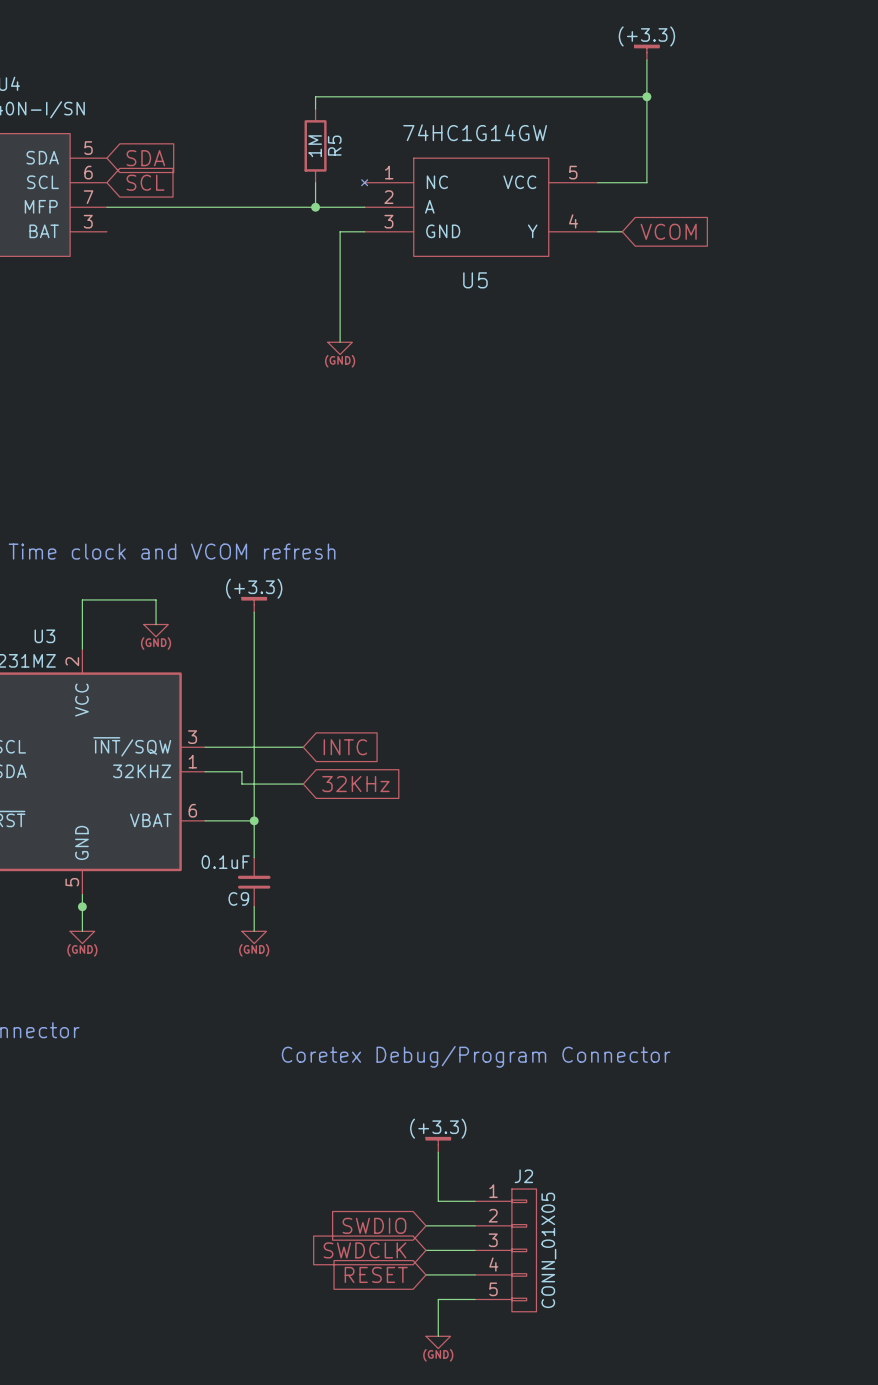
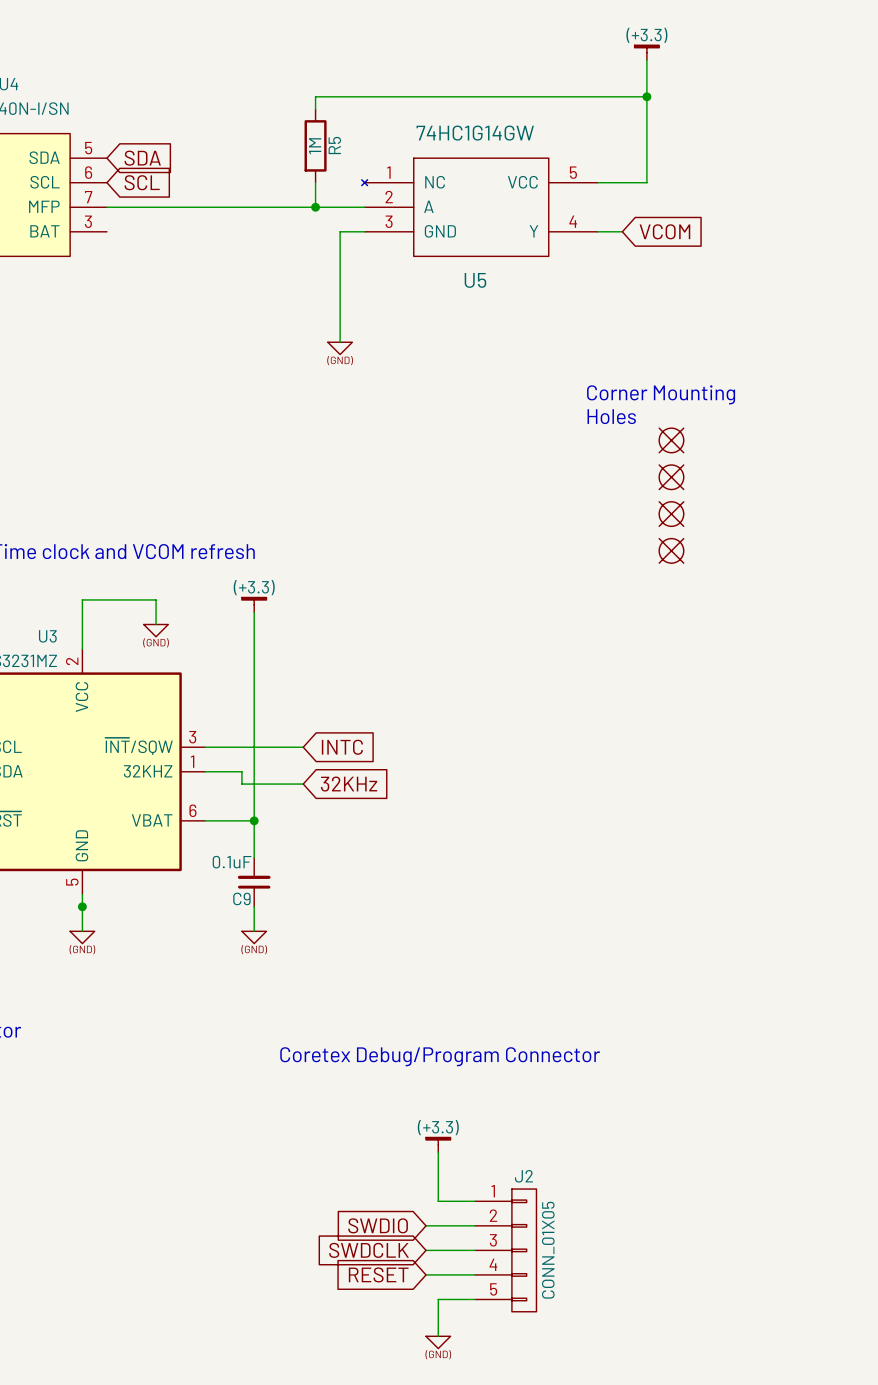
text: none -> Corner Mounting (661, 394)
text: none -> Holes (611, 416)
part: none -> (671, 440)
part: none -> (671, 477)
part: none -> (671, 514)
part: none -> (671, 550)

